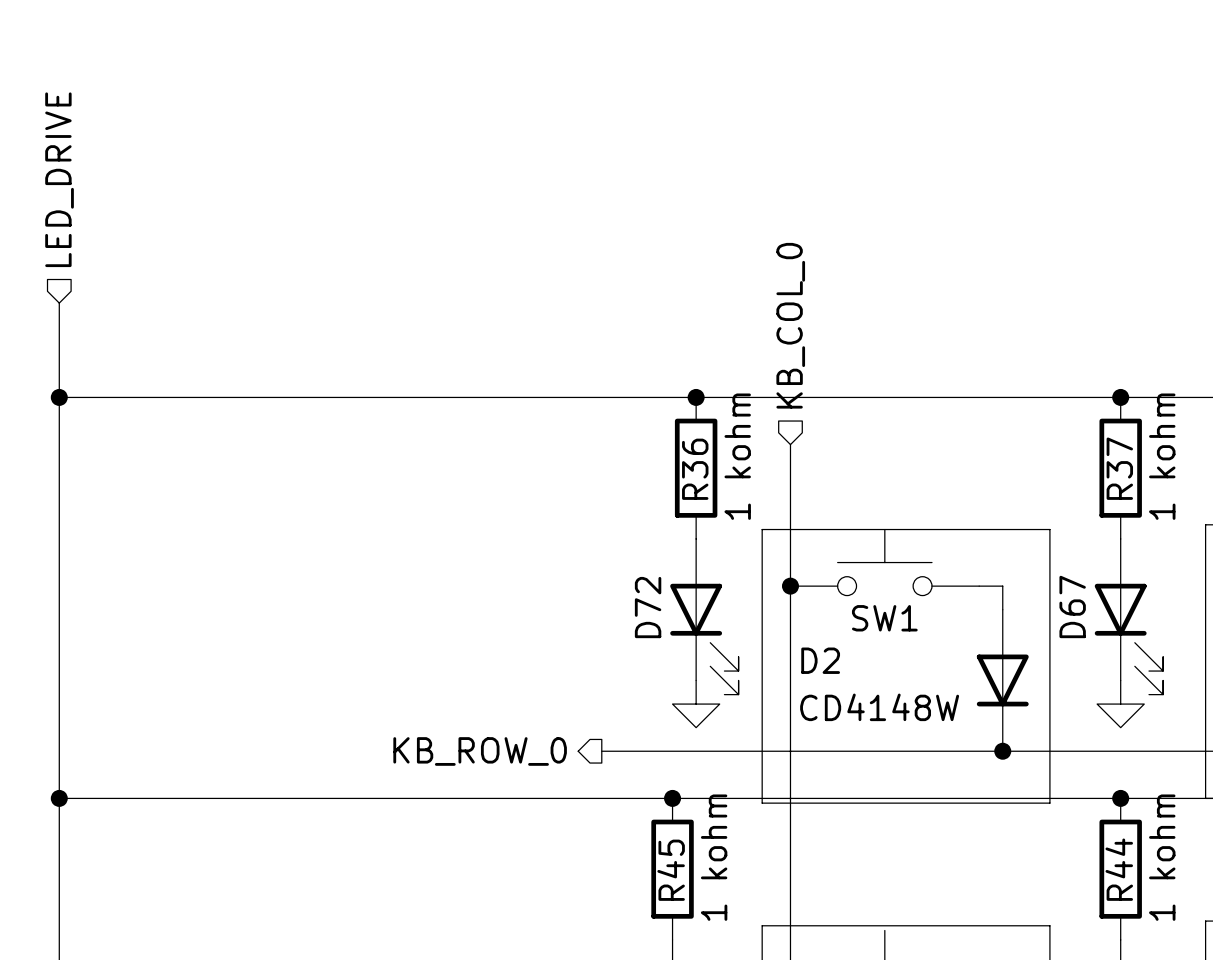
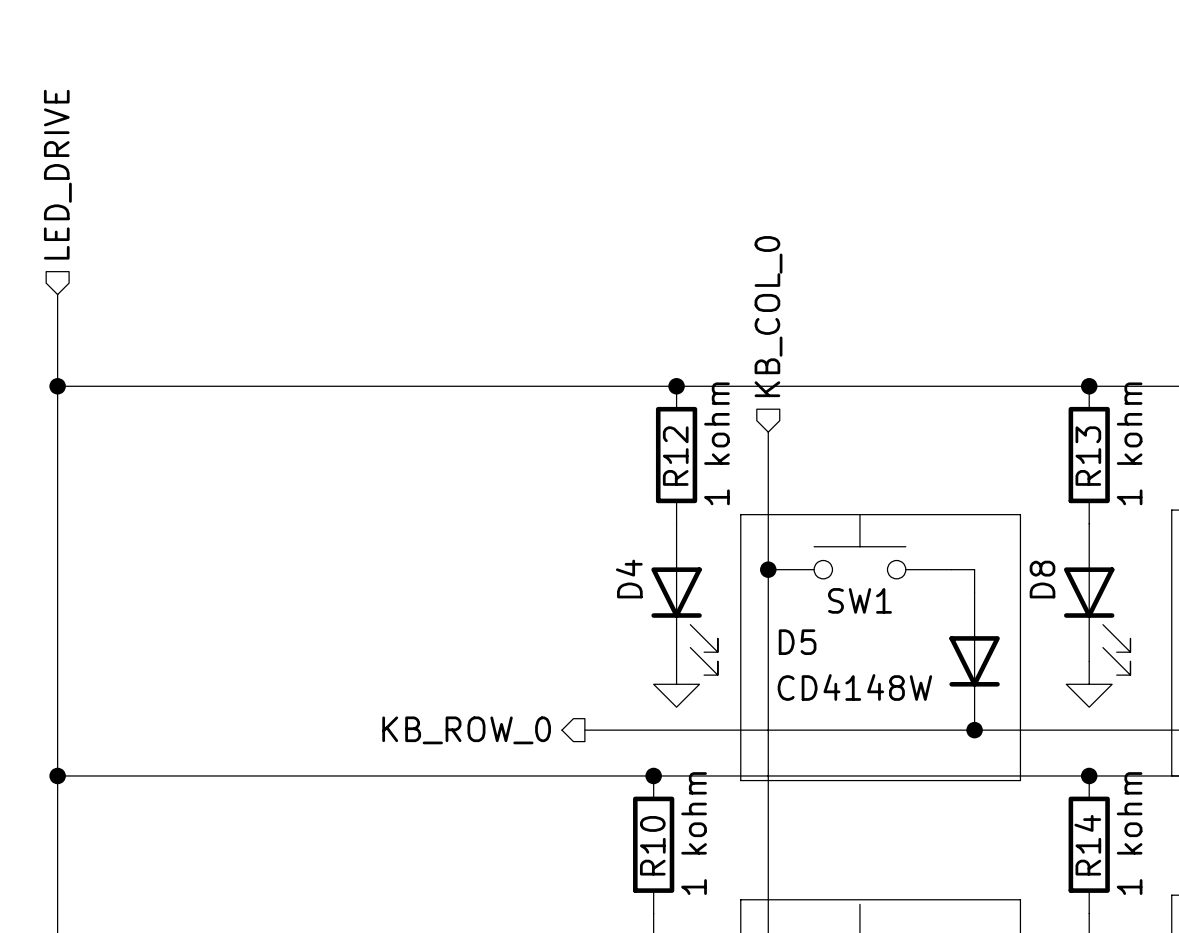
R37 name: R37 (1119, 468) -> R13 (1088, 456)
R36 name: R36 (695, 469) -> R12 (675, 456)
D67 name: D67 (1072, 606) -> D8 (1042, 579)
D72 name: D72 (648, 607) -> D4 (629, 579)
D2 name: D2 (820, 660) -> D5 (797, 642)
R44 name: R44 (1119, 869) -> R14 (1087, 845)
R45 name: R45 (671, 870) -> R10 (652, 845)

